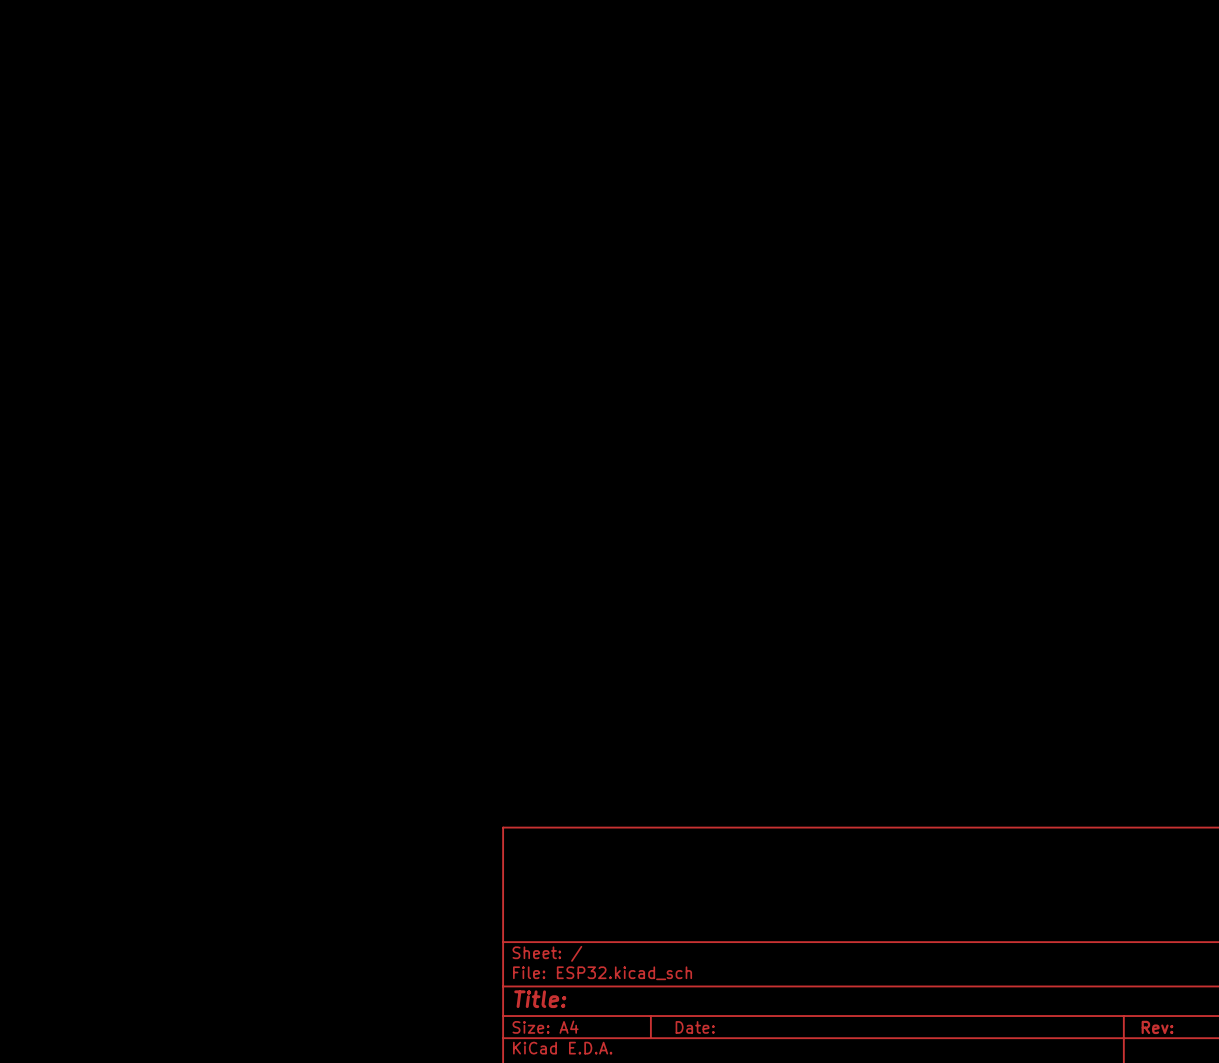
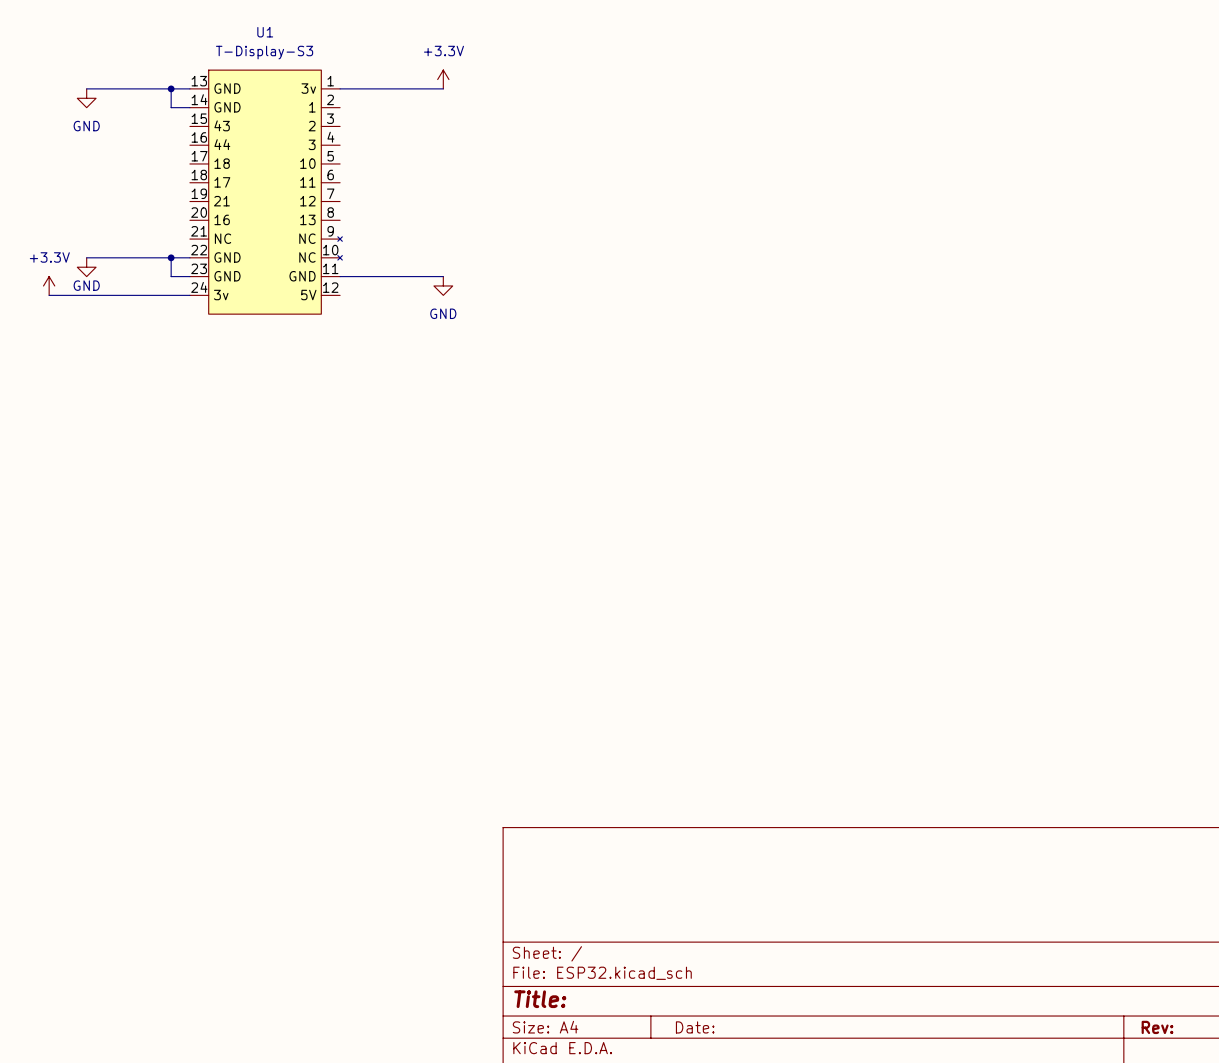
power symbol: none -> +3.3V (443, 79)
wire: none -> (86, 88) (189, 88)
wire: none -> (171, 88) (171, 107) (189, 107)
junction: none -> (171, 88)
wire: none -> (340, 88) (443, 88)
power symbol: none -> GND (86, 98)
U1: none -> T-Display-S3 (266, 192)
wire: none -> (86, 257) (189, 257)
wire: none -> (171, 257) (171, 276) (189, 276)
junction: none -> (171, 257)
power symbol: none -> GND (86, 267)
wire: none -> (340, 276) (443, 276)
power symbol: none -> +3.3V (49, 285)
power symbol: none -> GND (443, 285)
wire: none -> (49, 295) (189, 295)

